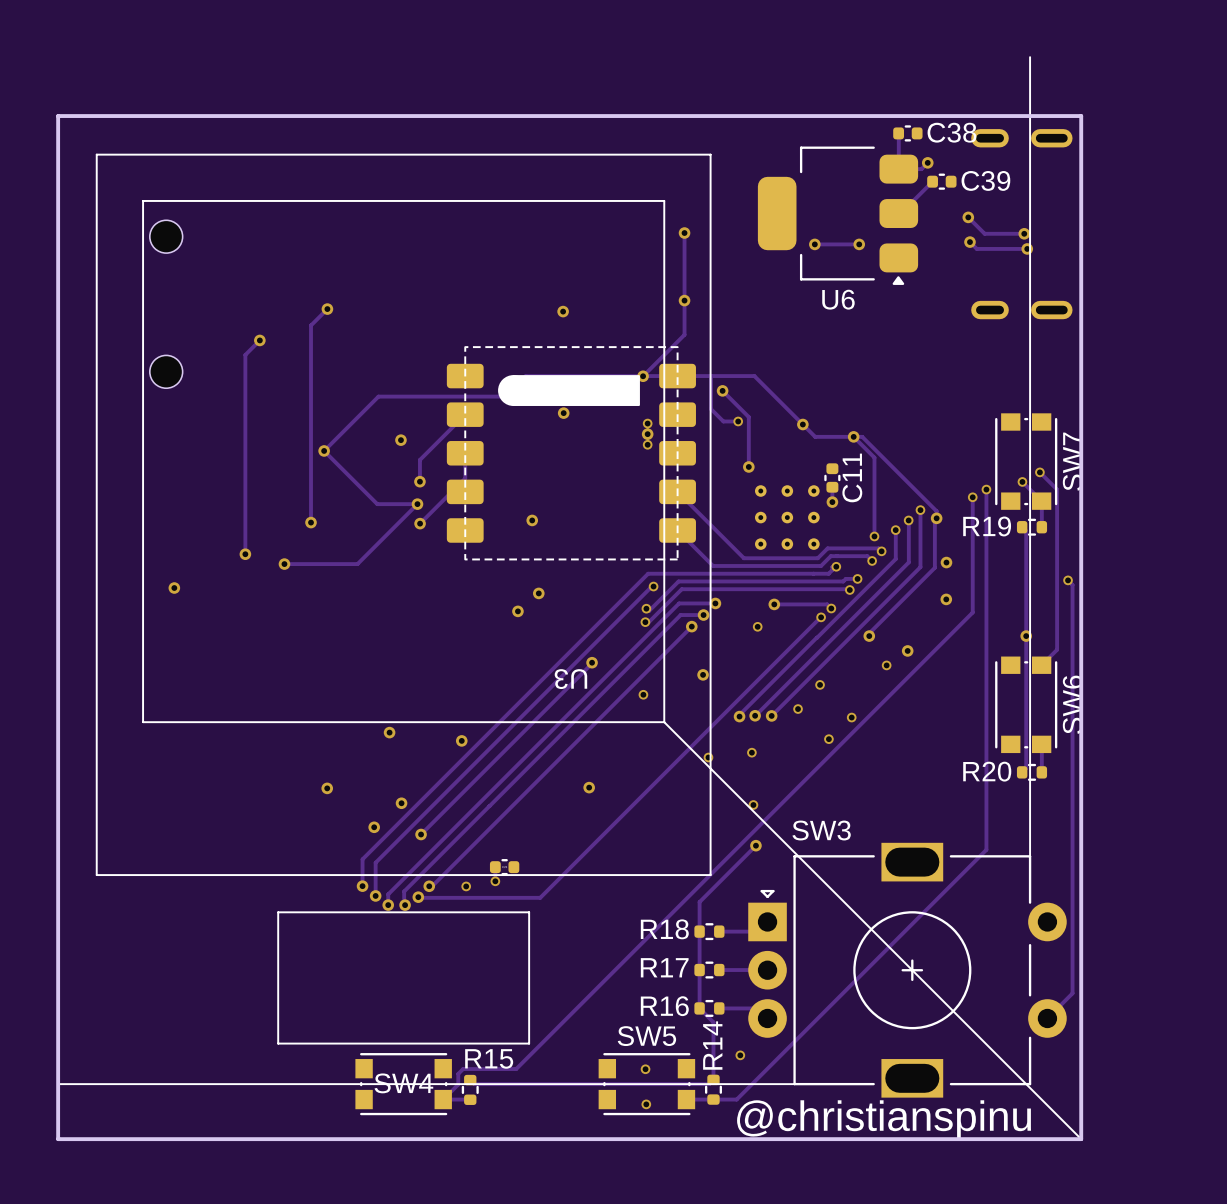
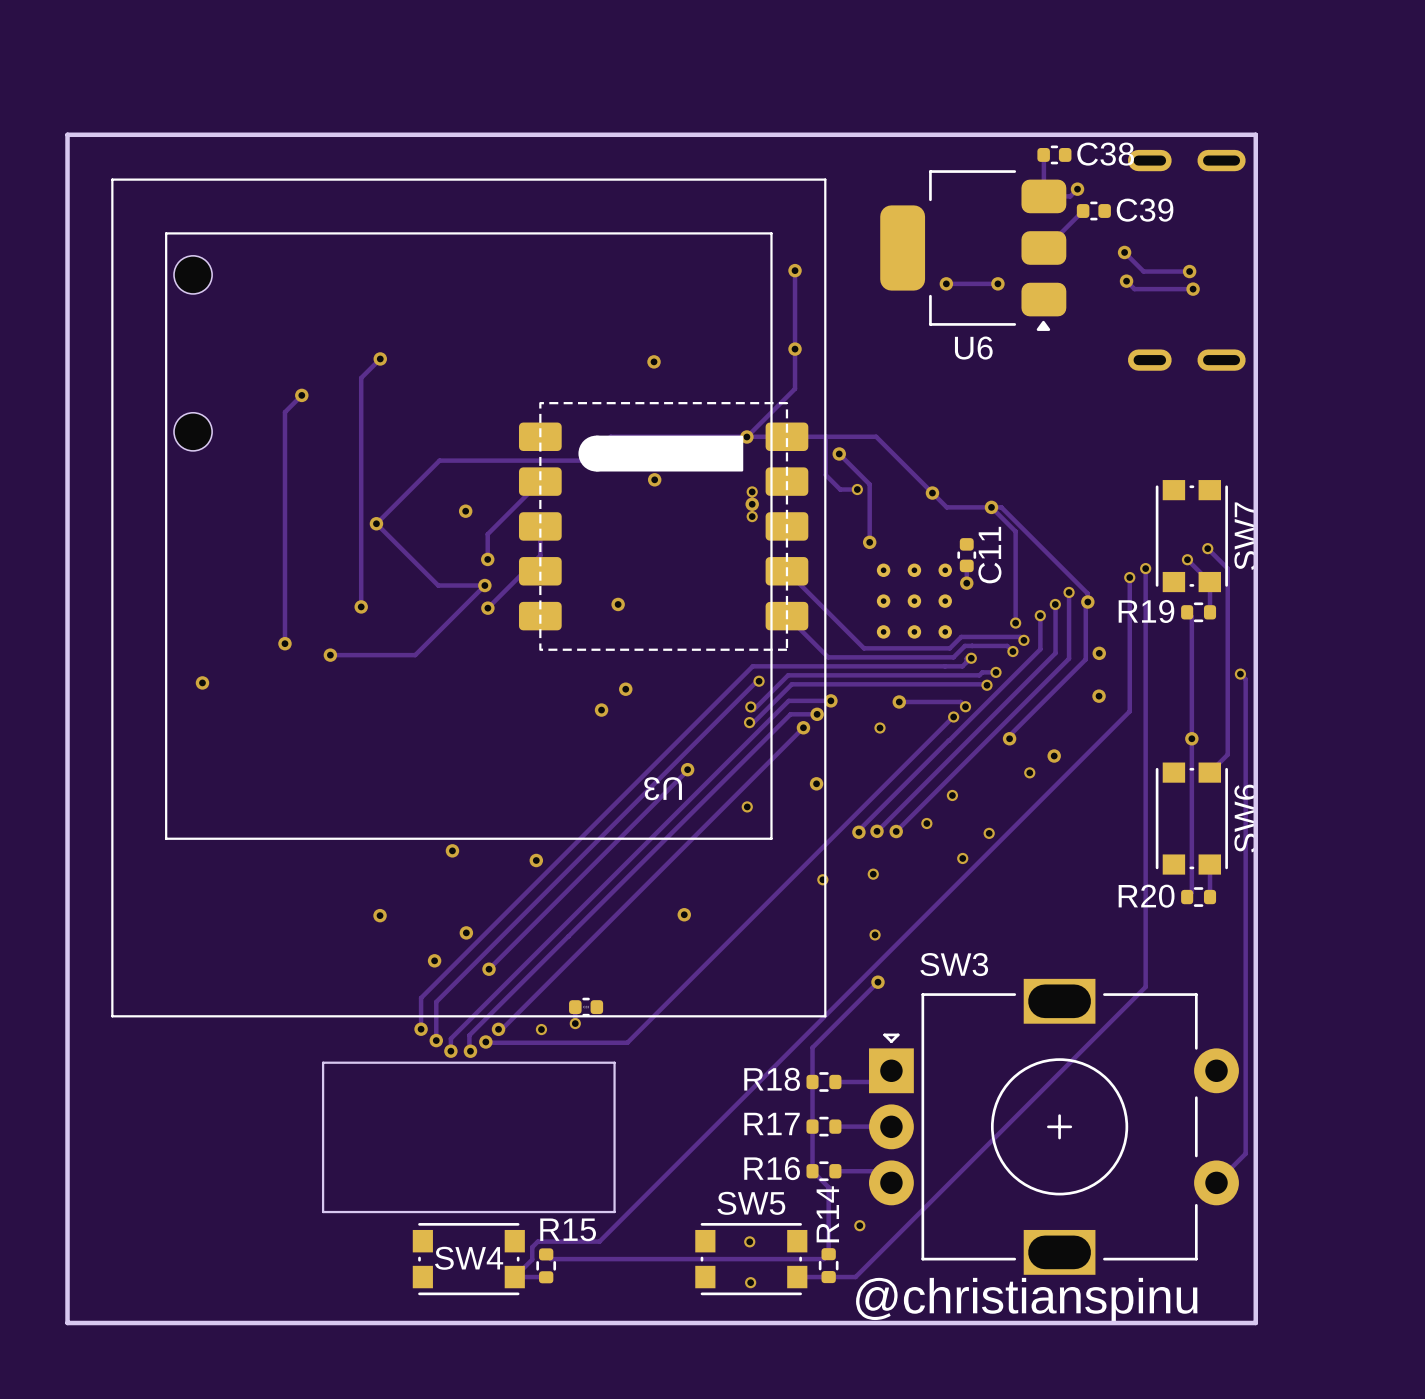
line: (1030, 57) (1030, 856) -> none
line: (664, 722) (1081, 1139) -> none
line: (278, 912) (529, 912) (529, 1043) (278, 1043) (278, 912) -> none
board edge: none -> (323, 1062) (614, 1062) (614, 1212) (323, 1212) (323, 1062)
line: (58, 1084) (794, 1084) -> none

